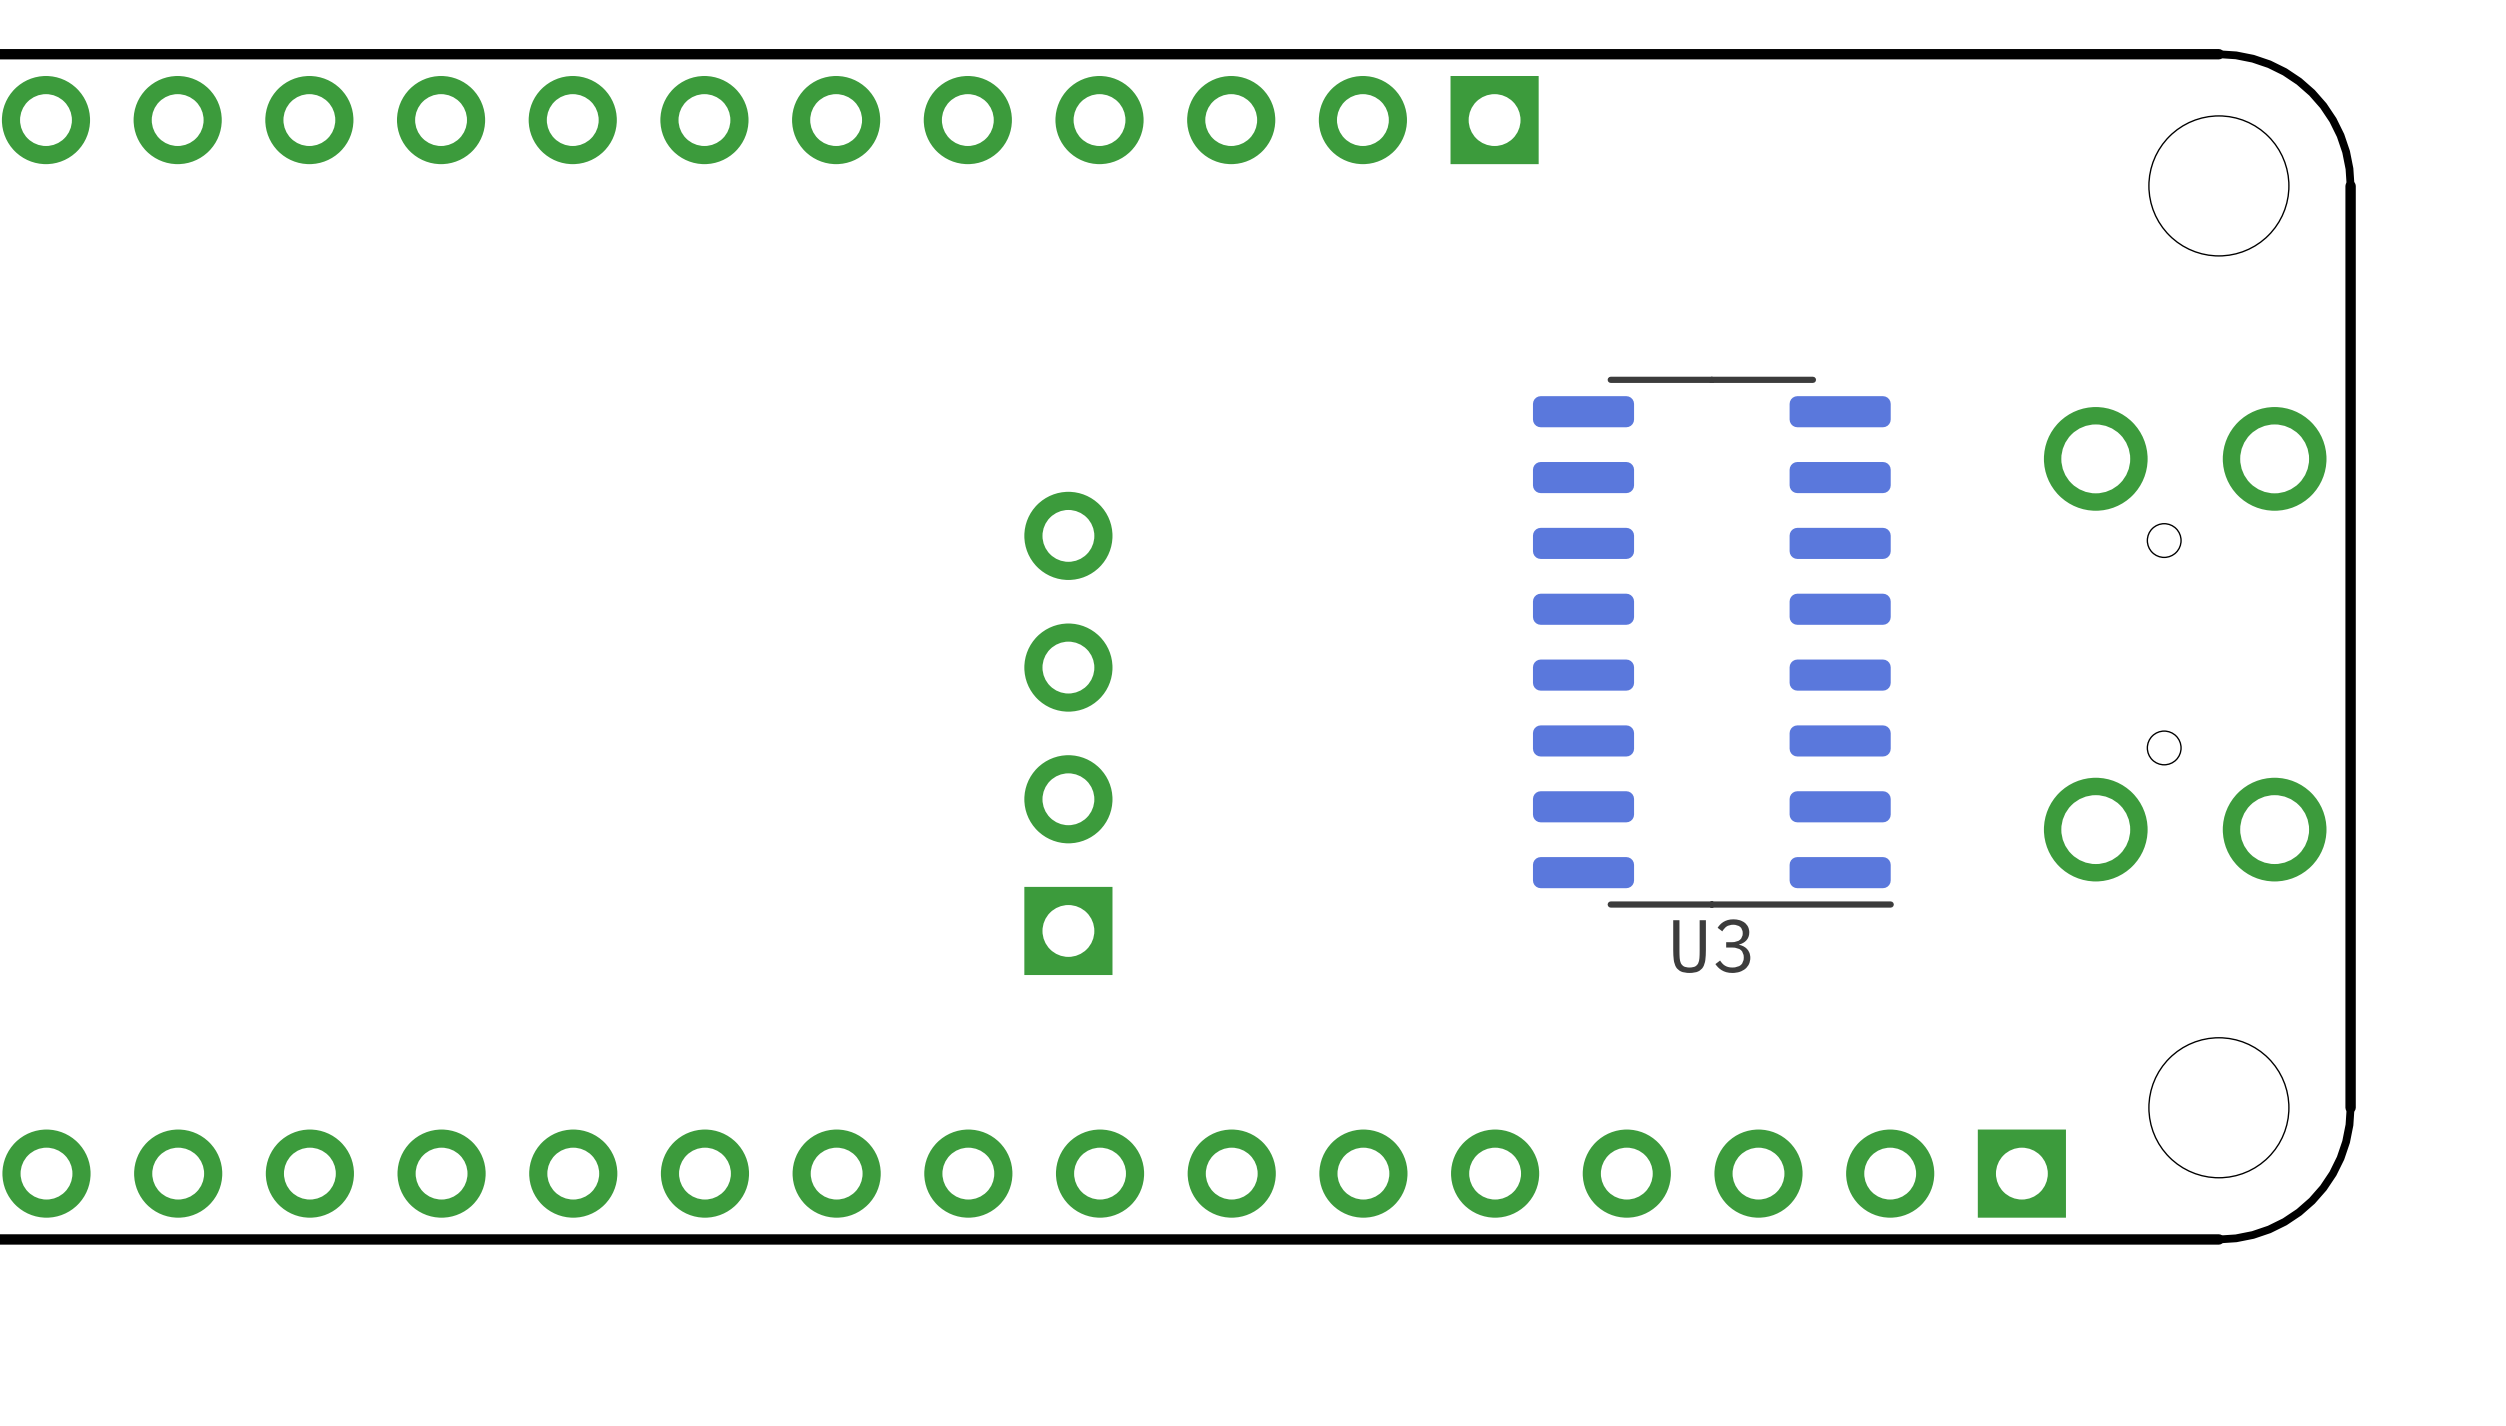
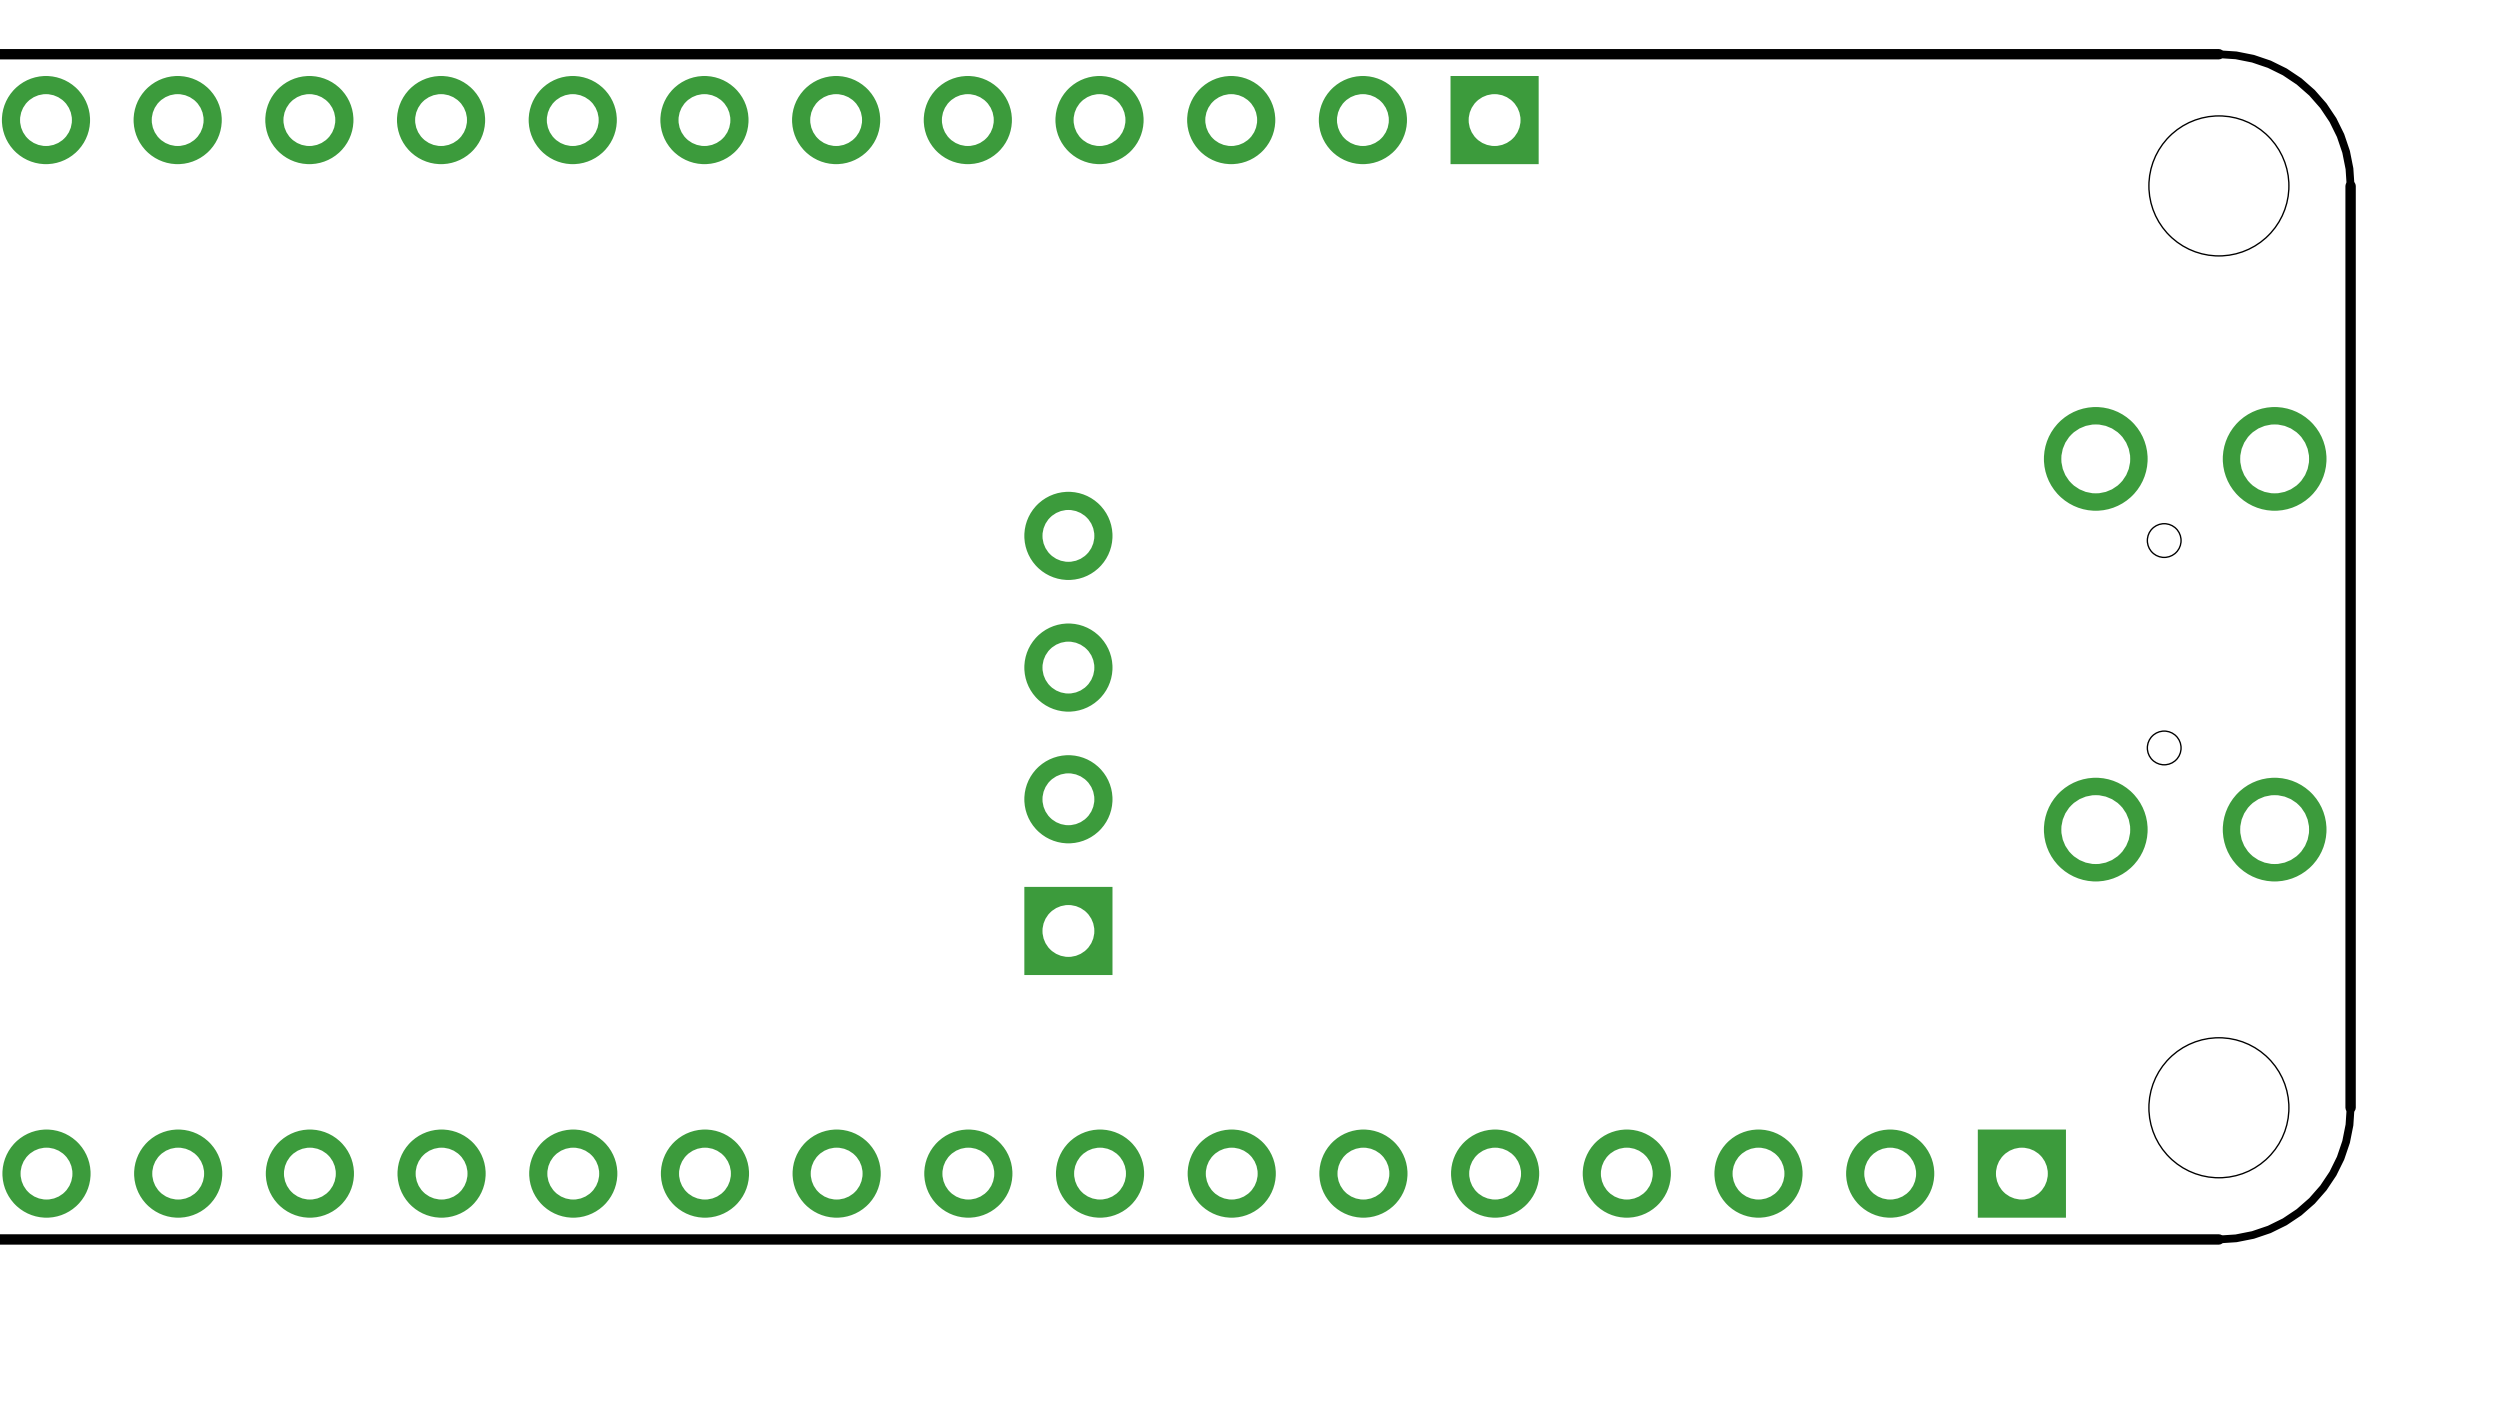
U3: (1713, 642) -> none

